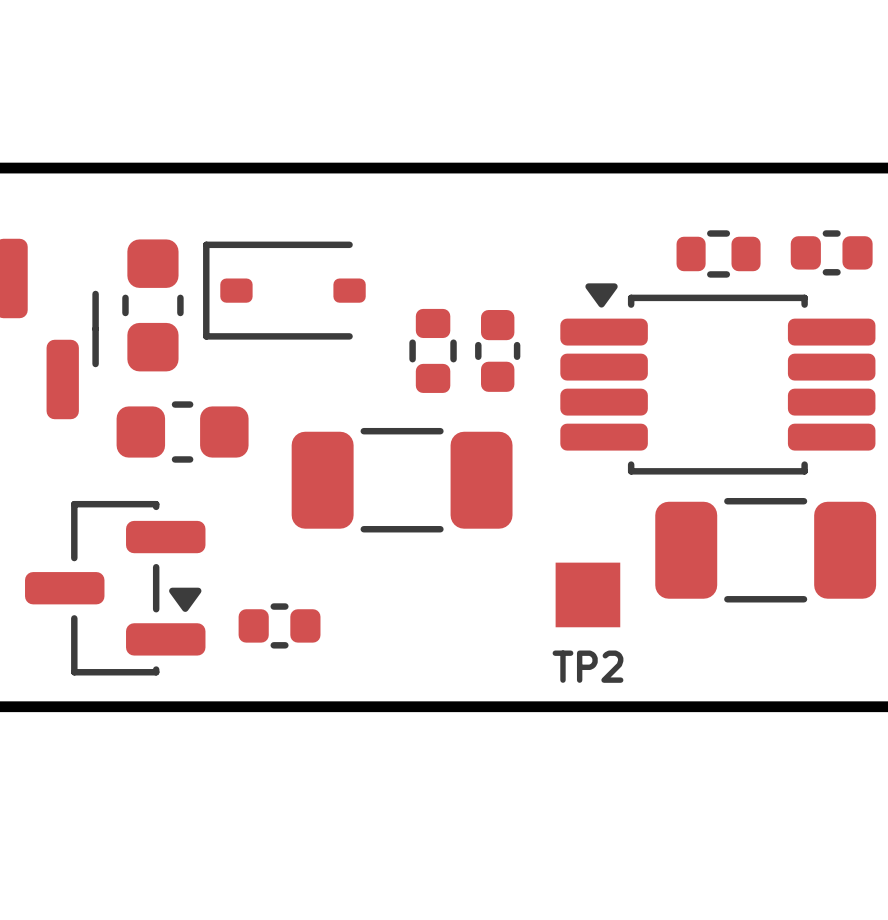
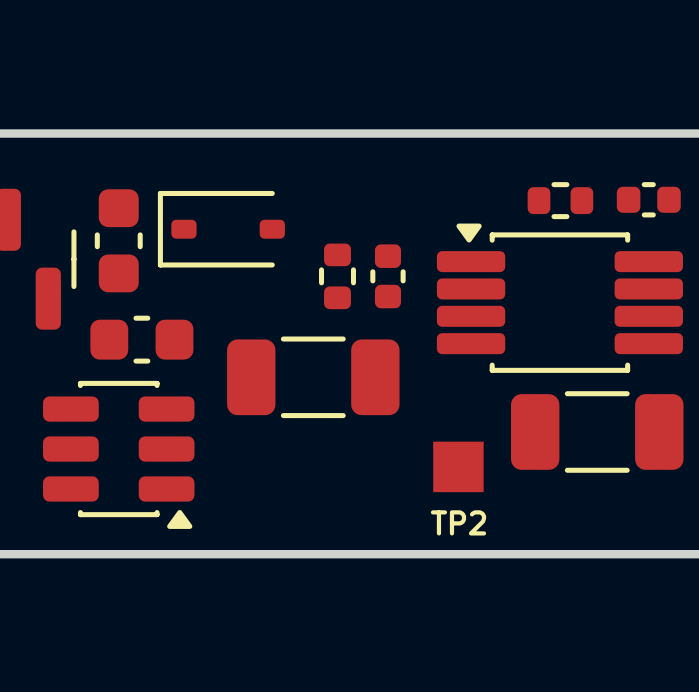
part footprint: [25, 500, 206, 676] -> [43, 380, 195, 529]
part: (279, 625) -> none

